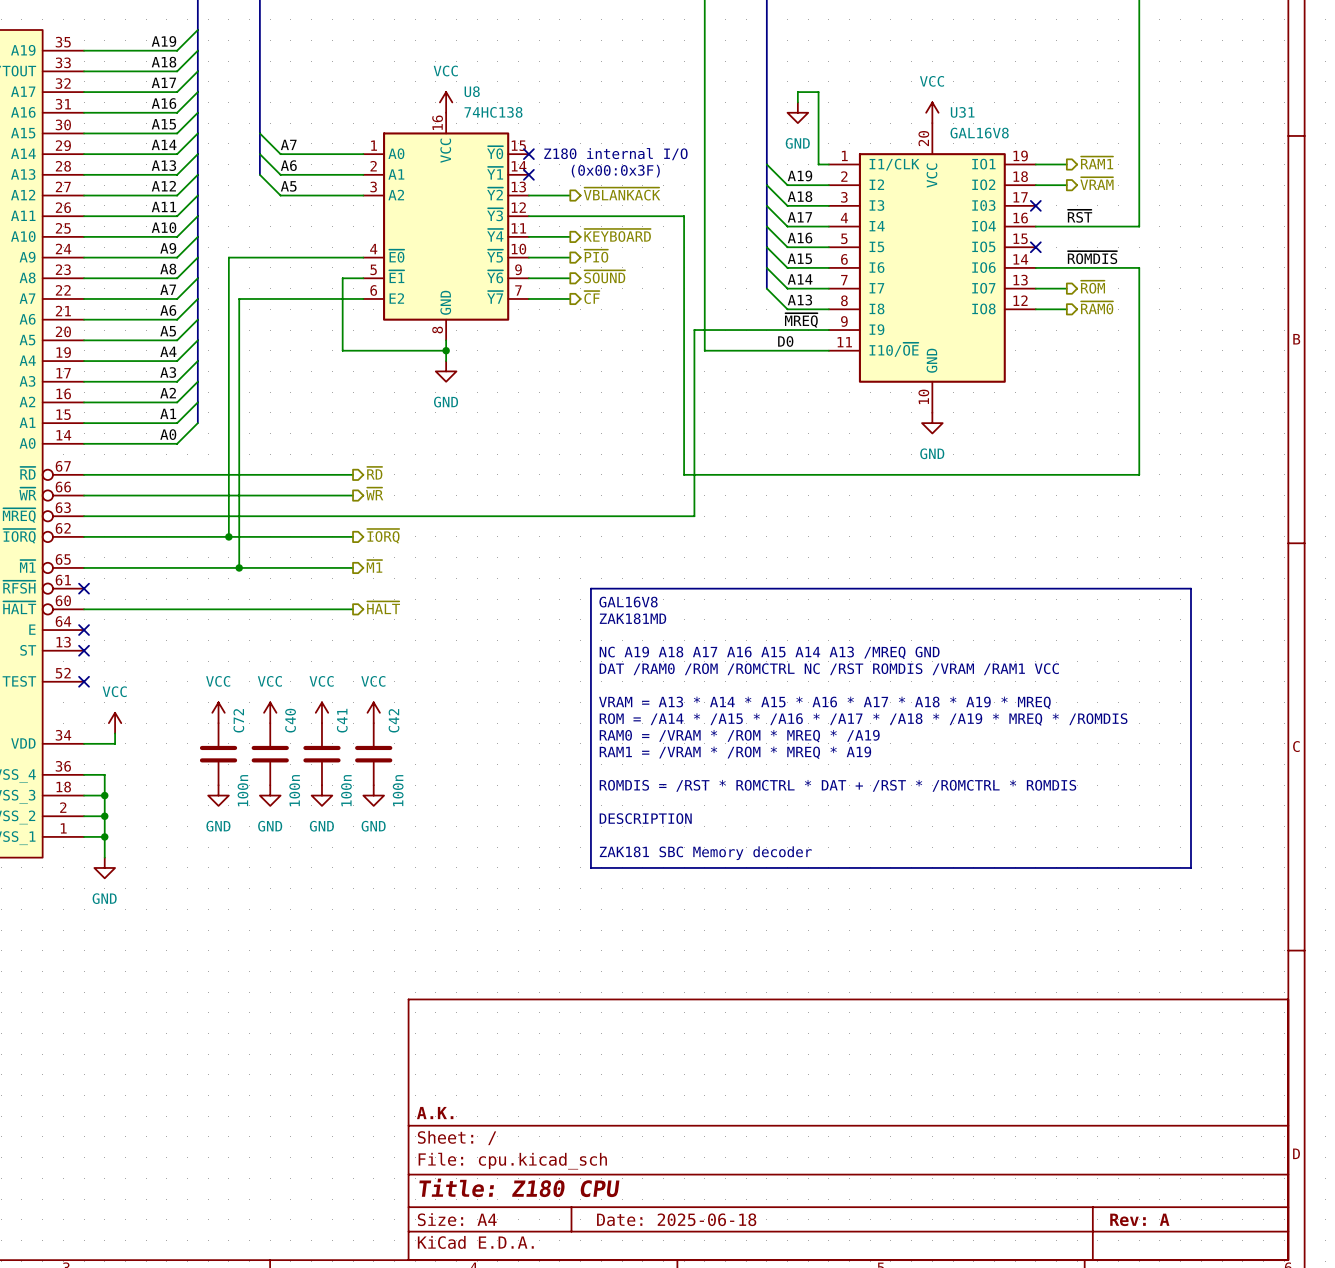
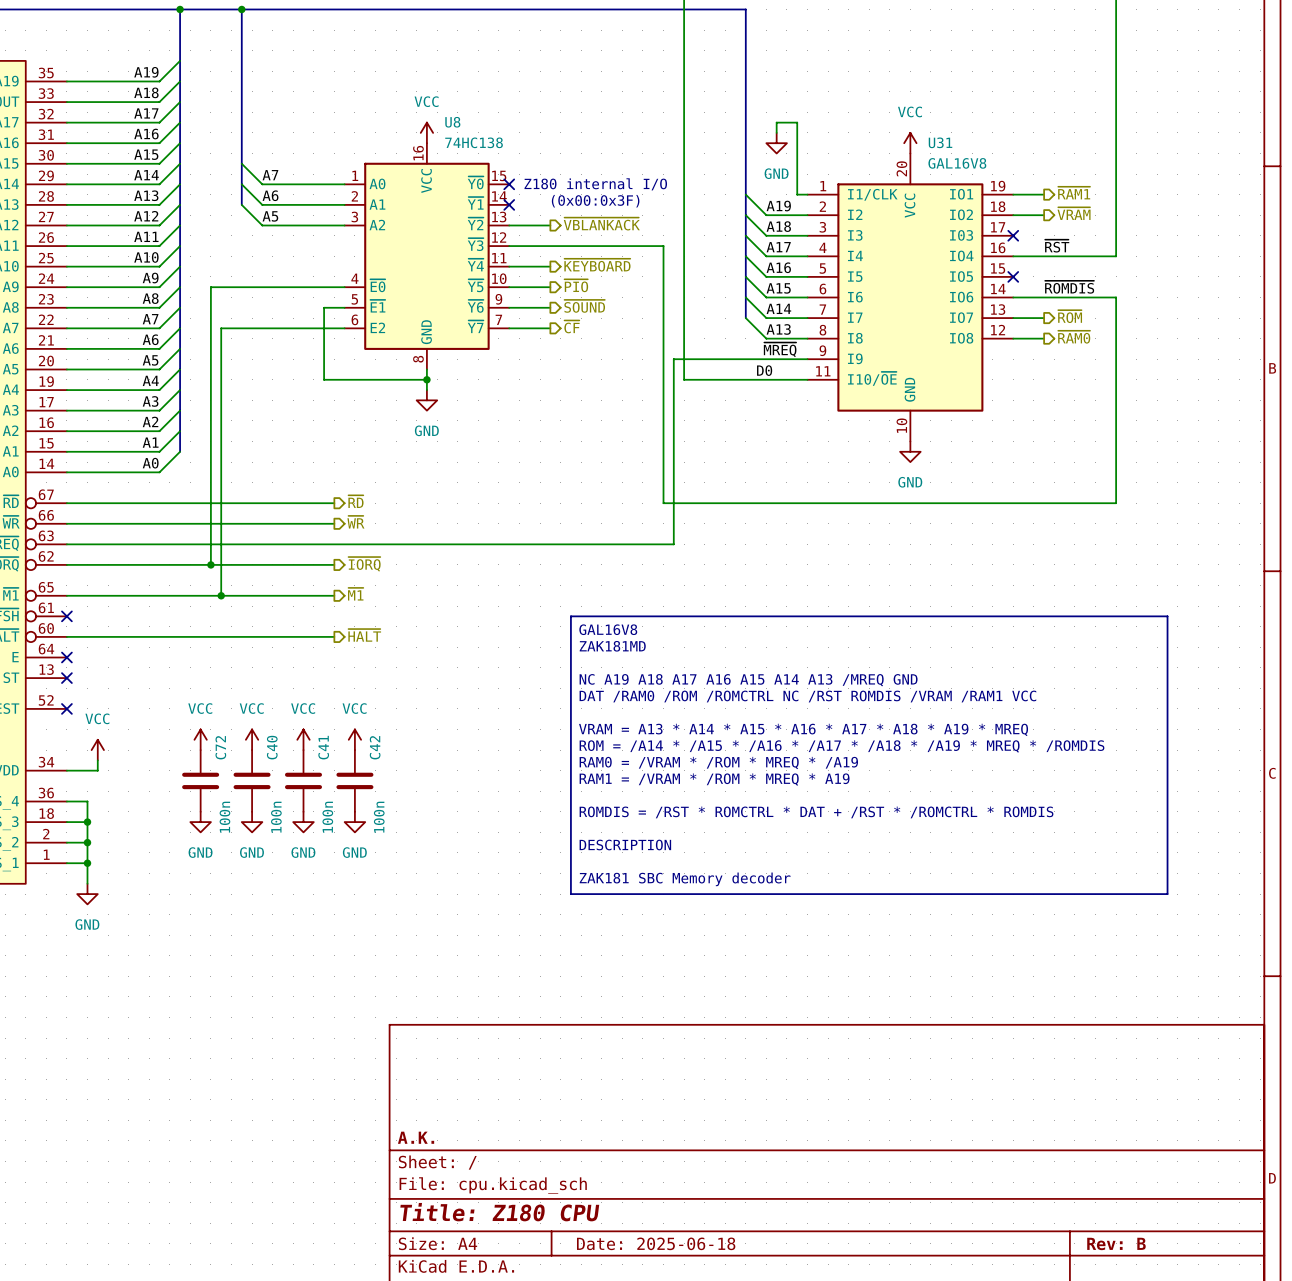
title block: Rev: A (1139, 1219) -> Rev: B (1116, 1243)

